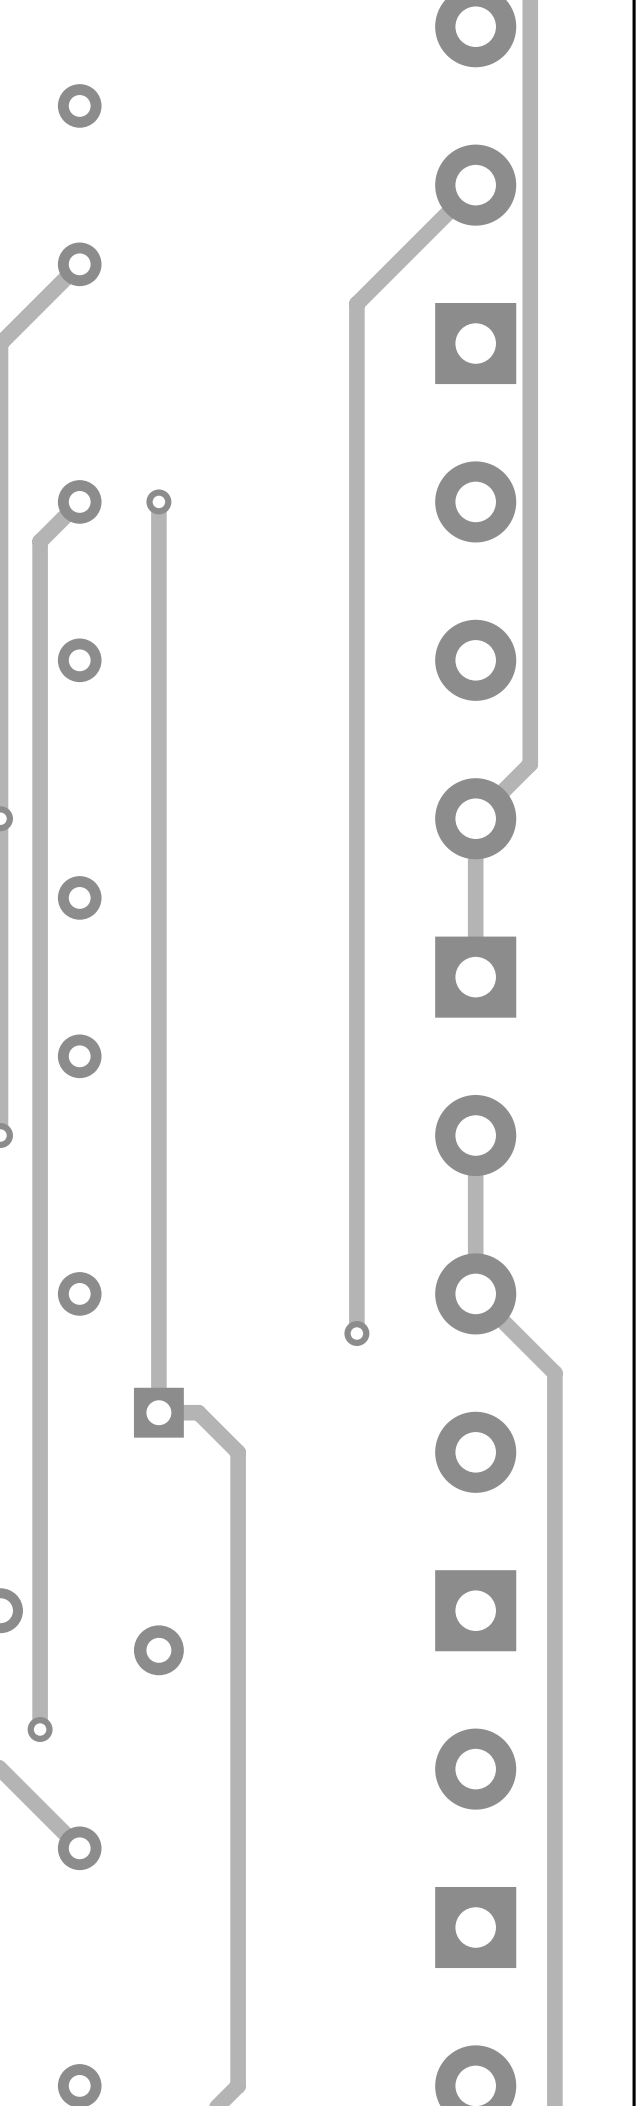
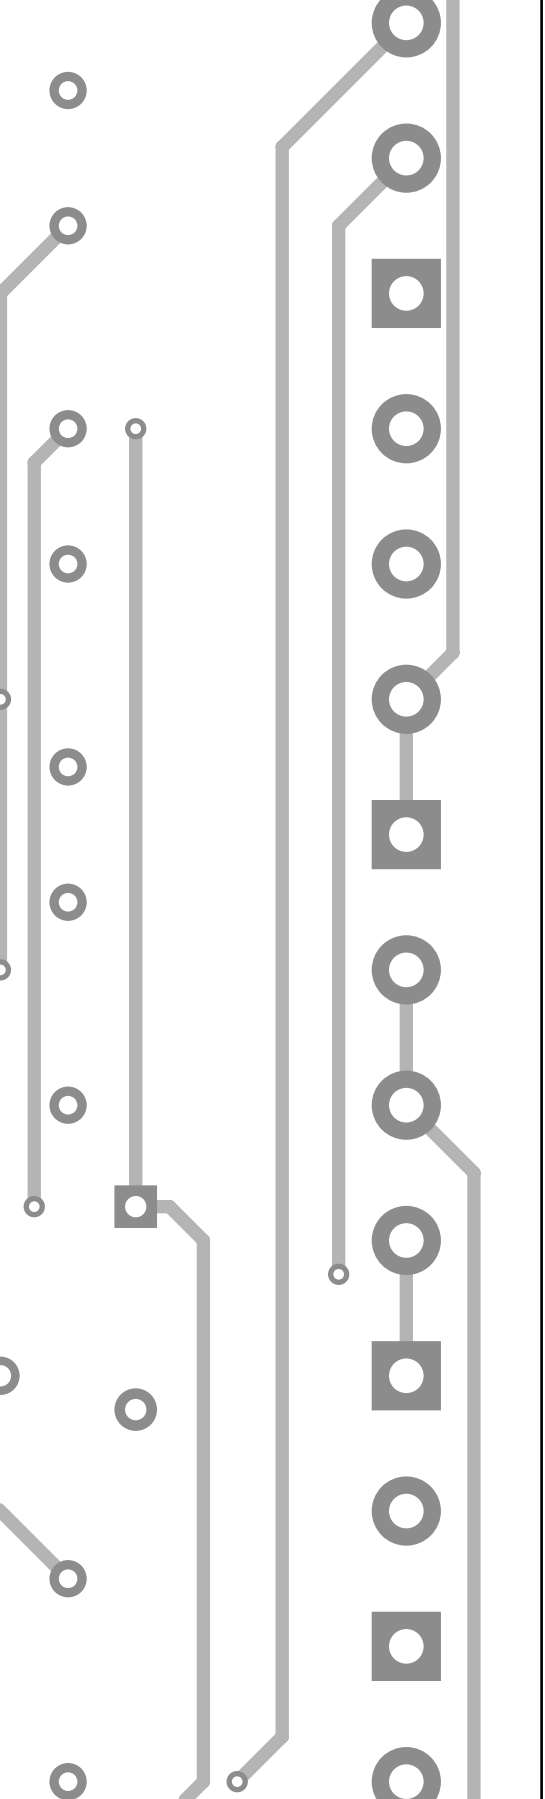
track: none -> (406, 22) (282, 146) (282, 1736) (237, 1781)
track: (396, 264) (356, 303) (356, 1333) -> (338, 225) (338, 1274)
via: (356, 1333) -> none
track: (40, 1412) (40, 1729) -> none
via: none -> (34, 1206)
track: none -> (406, 1240) (406, 1375)
via: none -> (338, 1274)
via: (40, 1729) -> none
via: none -> (237, 1781)

